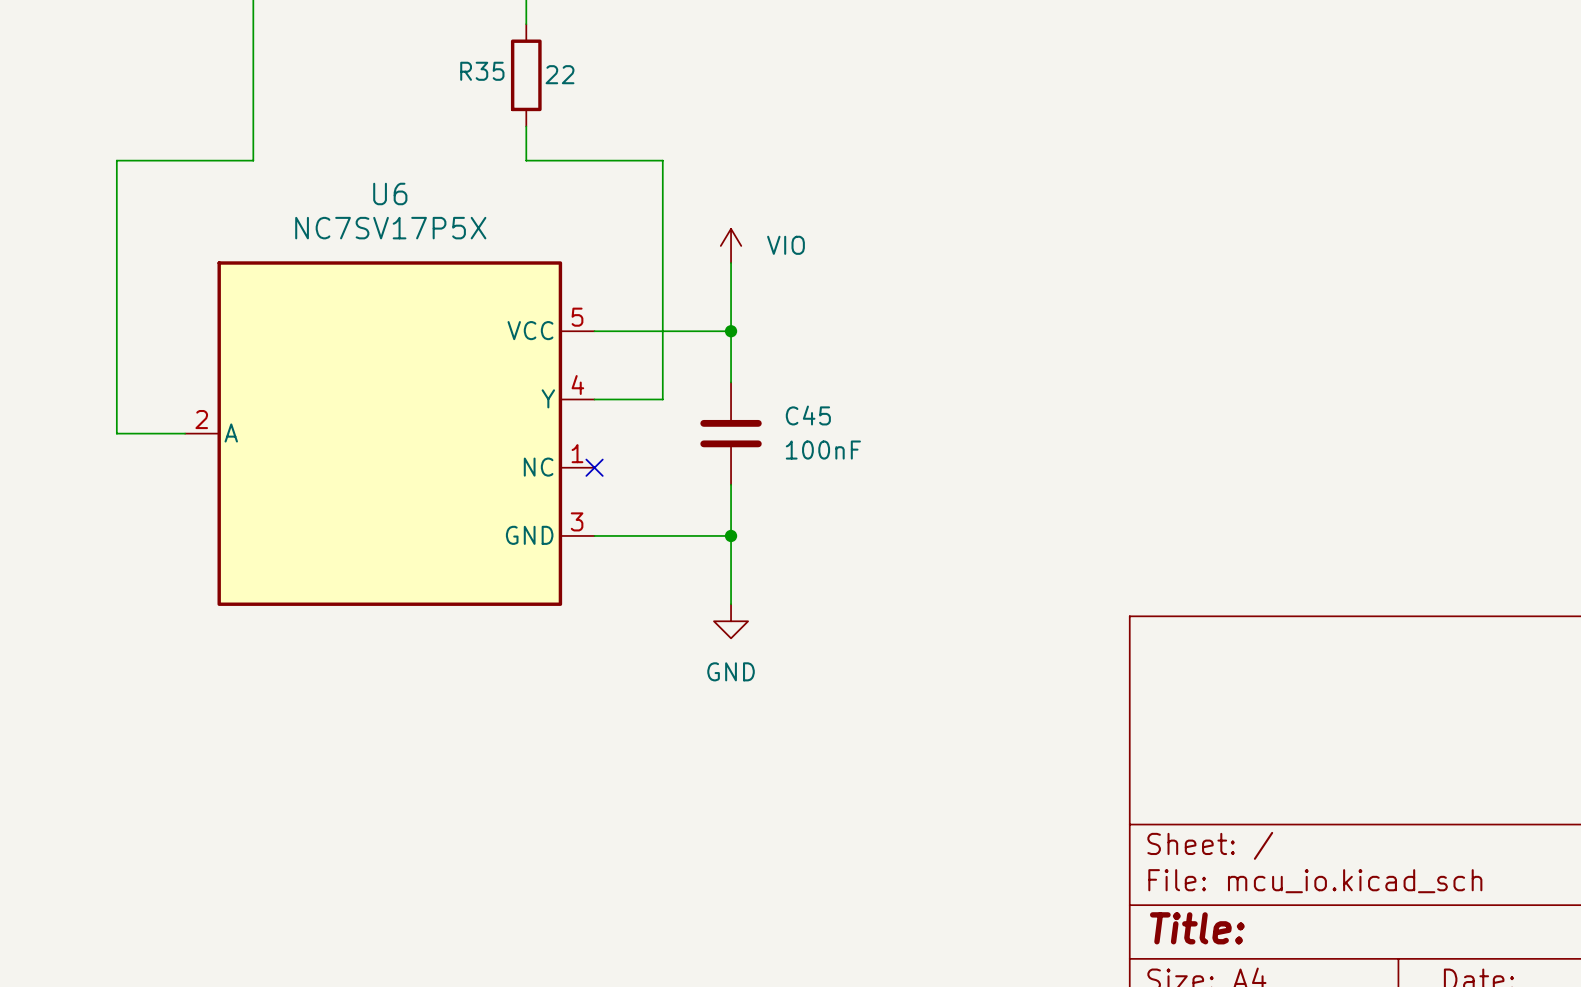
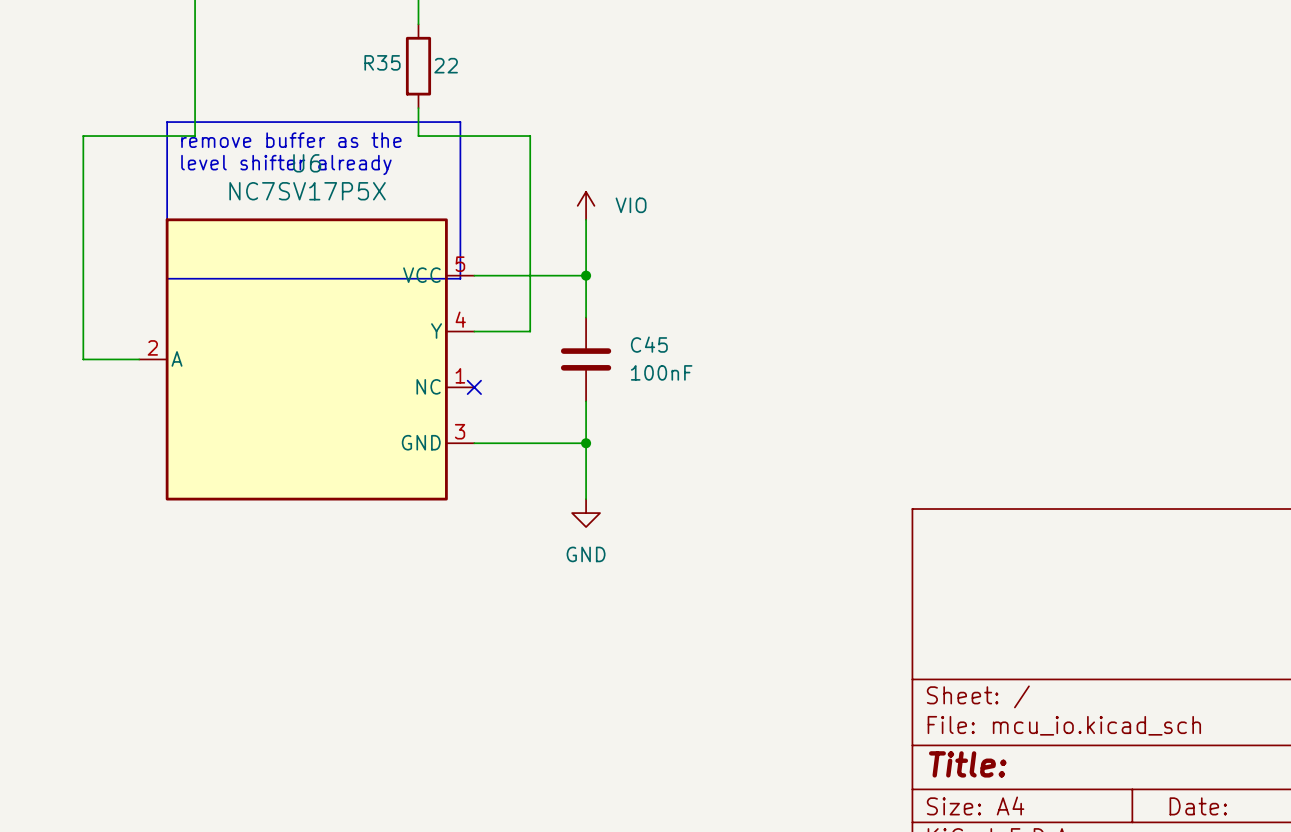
line: none -> (167, 122) (460, 122) (460, 278) (167, 278) (167, 122)
text: none -> remove buffer as the (291, 140)
text: none -> level shifter already (286, 164)

